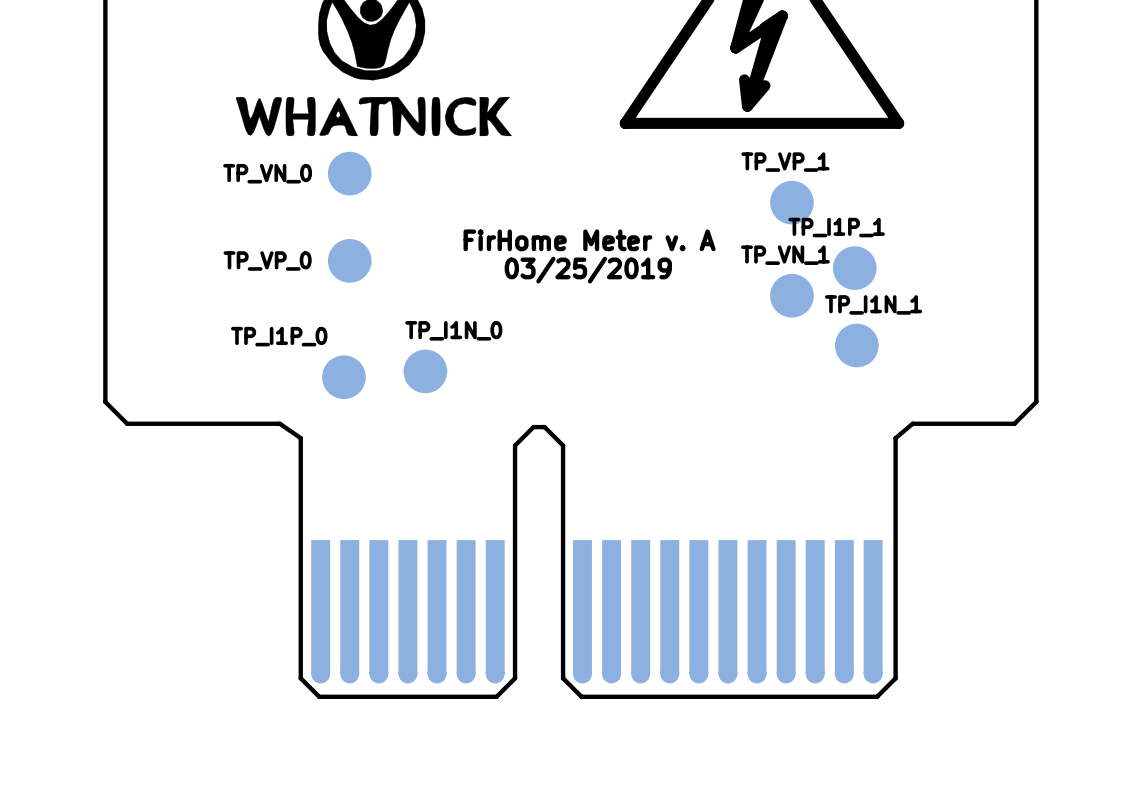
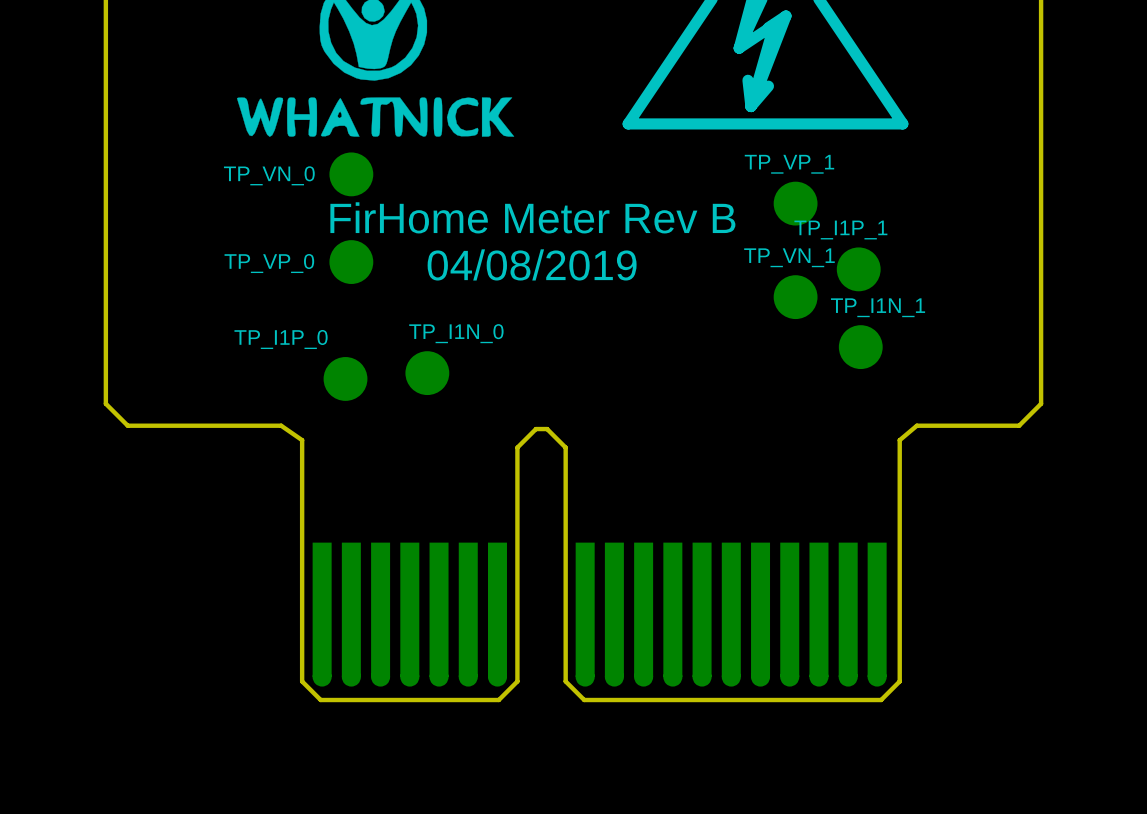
text: FirHome Meter v. A (589, 240) -> FirHome Meter Rev B (532, 217)
text: 03/25/2019 (588, 270) -> 04/08/2019 (532, 264)

